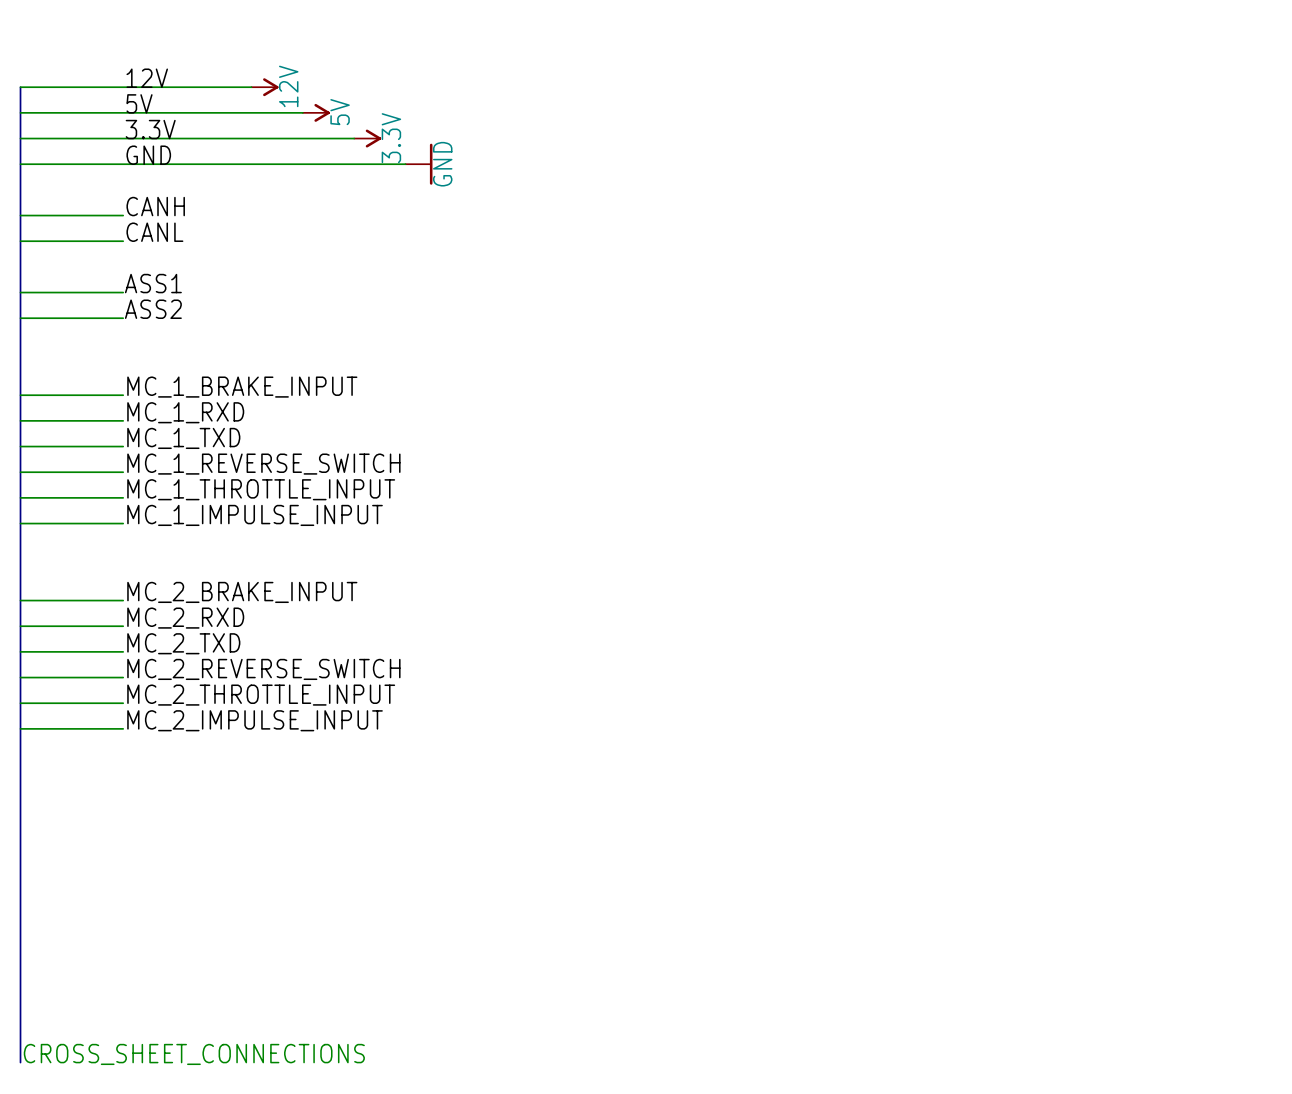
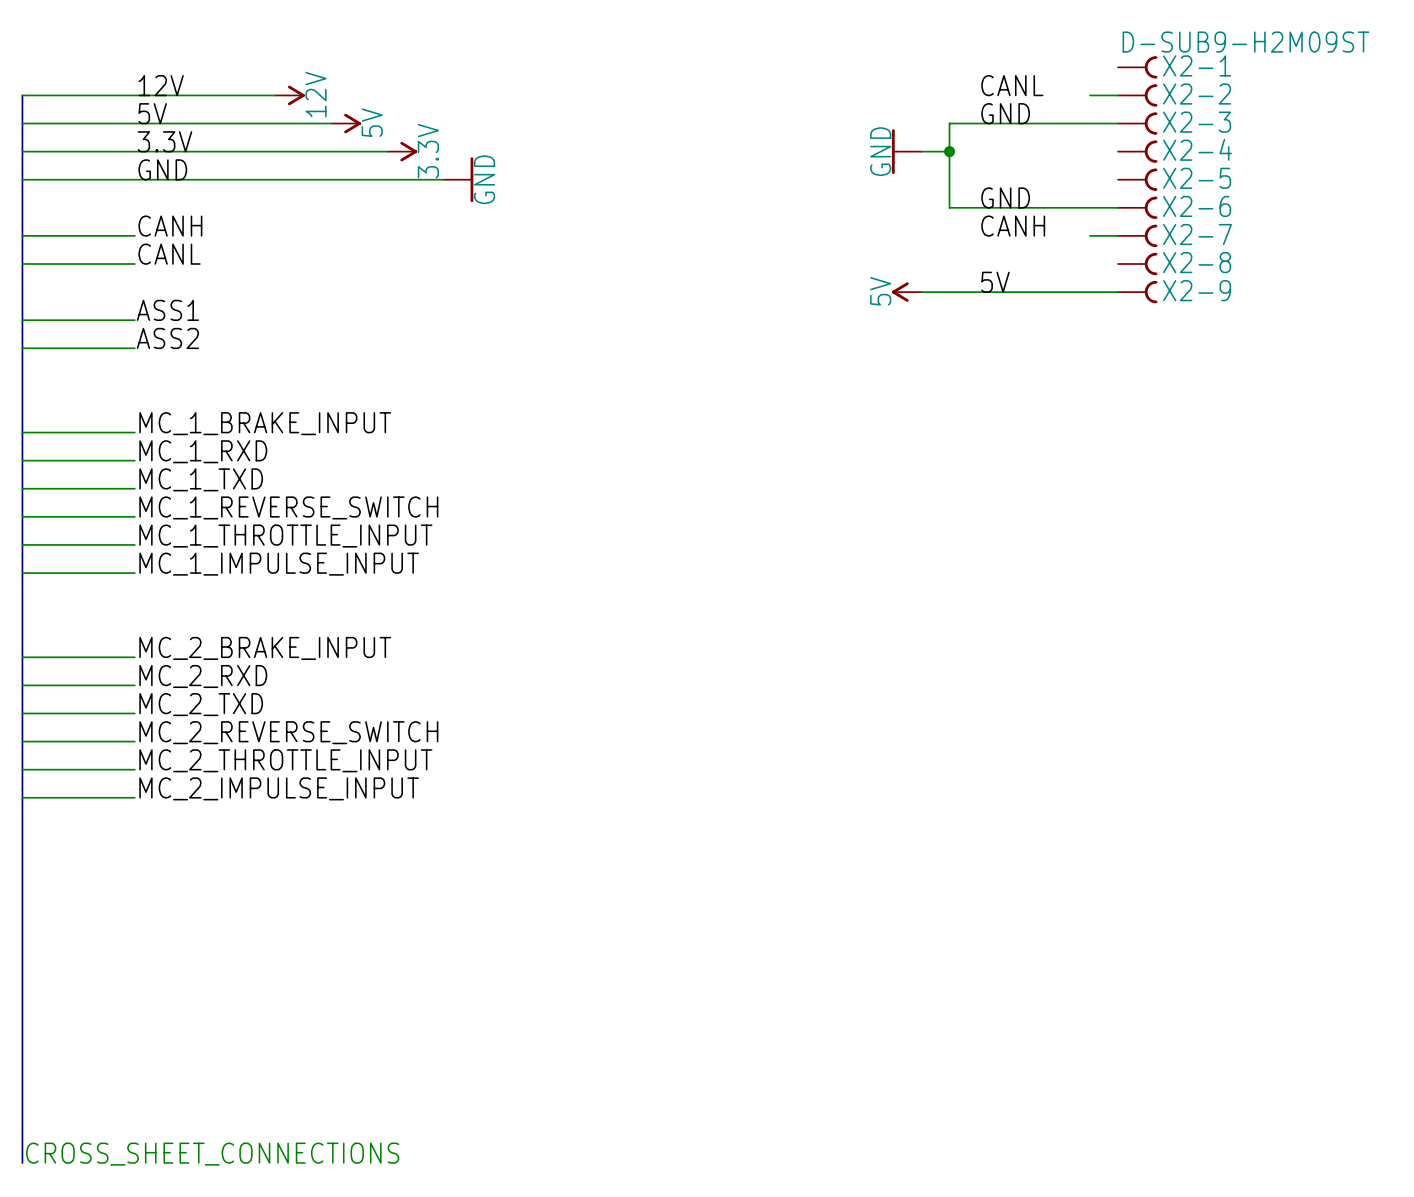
X2-1: none -> D-SUB9-H2M09ST (1137, 67)
label: none -> CANL (1012, 85)
wire: none -> (1089, 95) (1118, 95)
X2-2: none -> (1137, 95)
label: none -> GND (1005, 113)
wire: none -> (1118, 123) (949, 123) (949, 207) (1118, 207)
X2-3: none -> (1137, 123)
power symbol: none -> GND (906, 151)
wire: none -> (921, 151) (949, 151)
junction: none -> (949, 151)
X2-4: none -> (1137, 151)
X2-5: none -> (1137, 179)
label: none -> GND (1005, 197)
X2-6: none -> (1137, 207)
label: none -> CANH (1013, 226)
wire: none -> (1089, 235) (1118, 235)
X2-7: none -> (1137, 235)
X2-8: none -> (1137, 264)
label: none -> 5V (995, 282)
power symbol: none -> 5V (906, 292)
wire: none -> (921, 292) (1118, 292)
X2-9: none -> (1137, 292)

